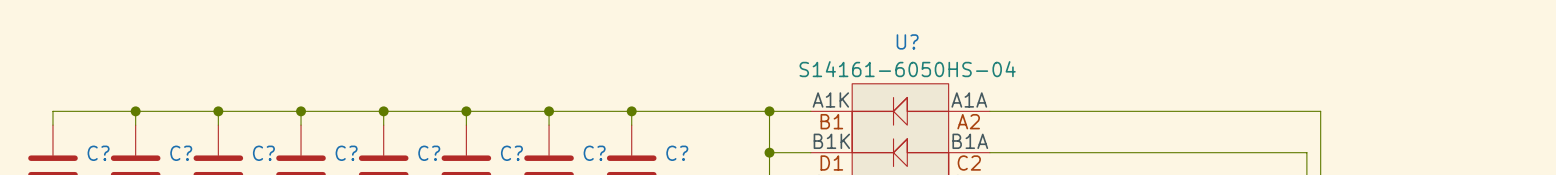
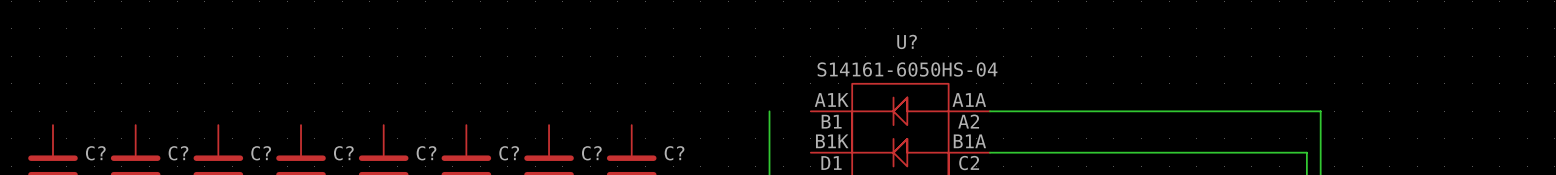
wire: (135, 111) (135, 125) -> none
junction: (135, 111) -> none
wire: (218, 111) (218, 125) -> none
junction: (218, 111) -> none
wire: (301, 111) (301, 125) -> none
junction: (301, 111) -> none
wire: (383, 111) (383, 125) -> none
junction: (383, 111) -> none
wire: (466, 111) (466, 125) -> none
junction: (466, 111) -> none
wire: (549, 111) (549, 125) -> none
junction: (549, 111) -> none
wire: (631, 111) (631, 125) -> none
junction: (631, 111) -> none
junction: (769, 111) -> none
wire: (810, 111) (52, 111) (52, 125) -> none
wire: (769, 152) (810, 152) -> none
junction: (769, 152) -> none

